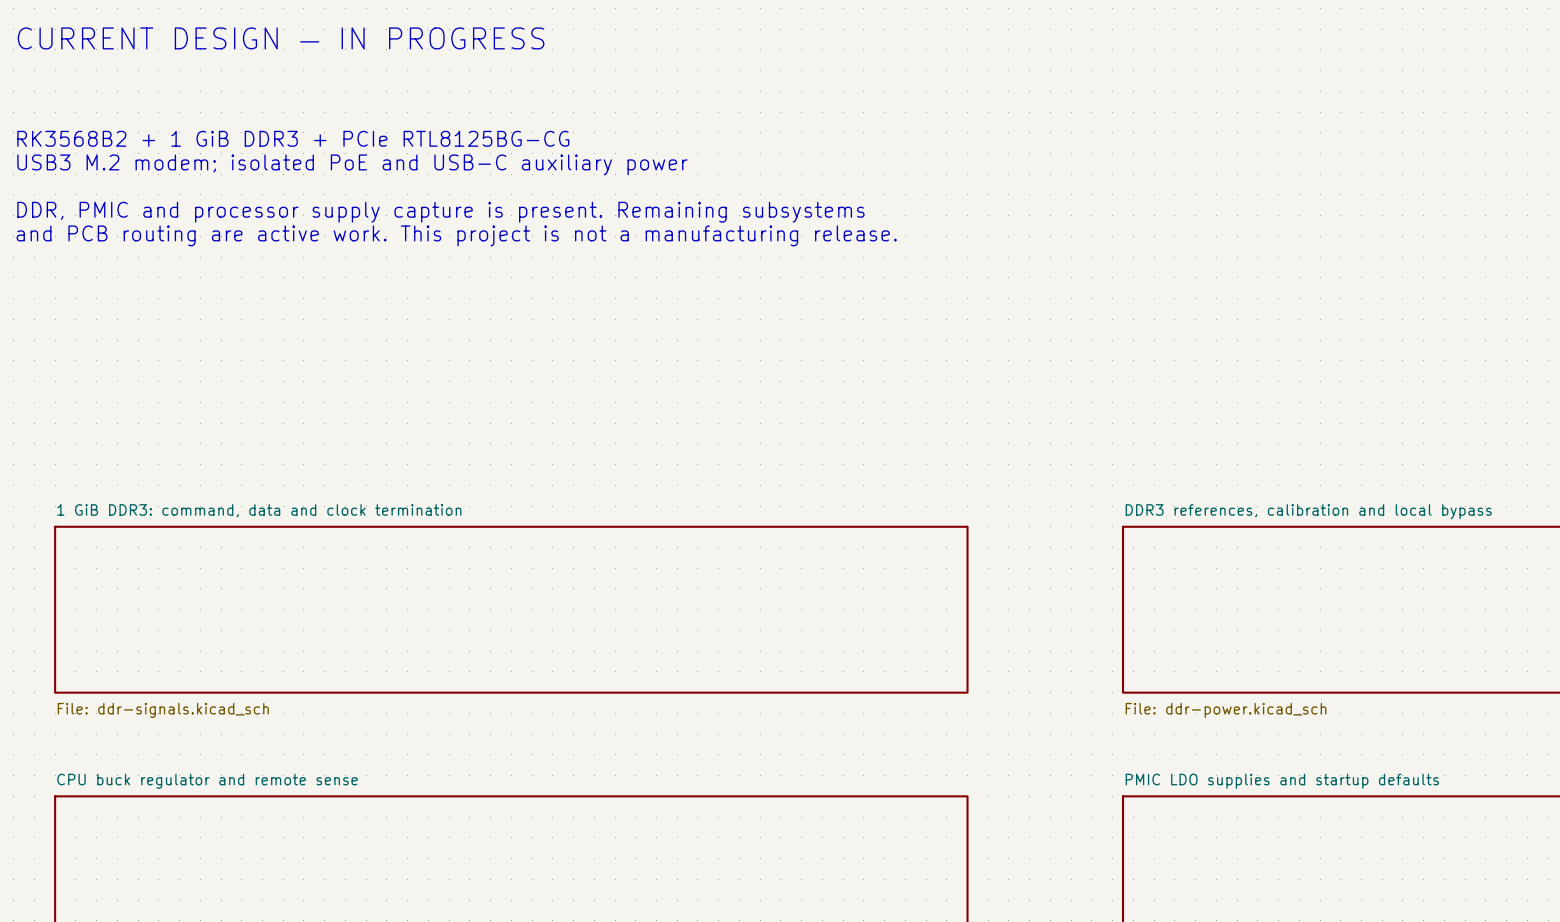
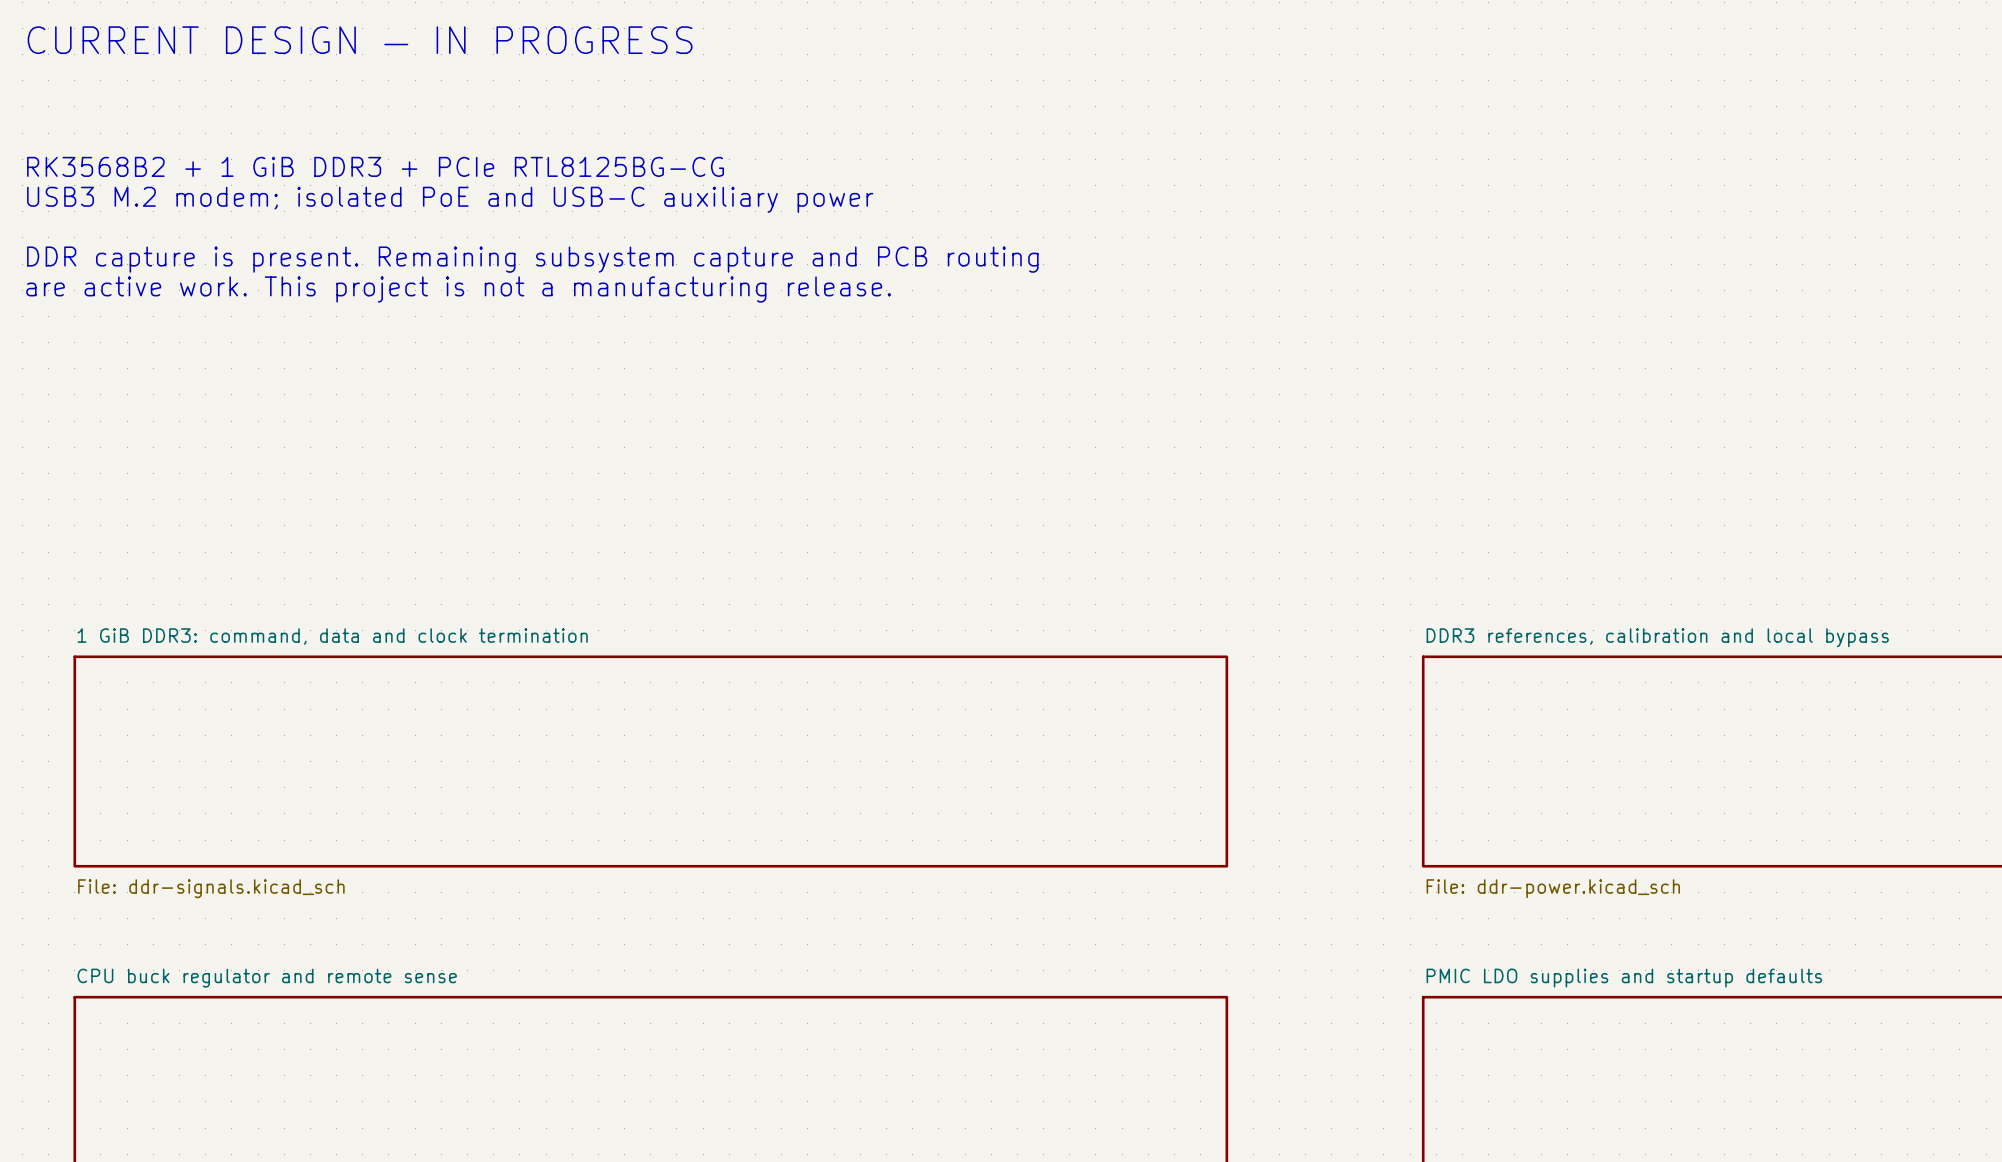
text: DDR, PMIC and processor supply capture is present. Remaining subsystems (440, 212) -> DDR capture is present. Remaining subsystem capture and PCB routing (532, 259)
text: and PCB routing are active work. This project is not a manufacturing release. (456, 235) -> are active work. This project is not a manufacturing release. (458, 289)

